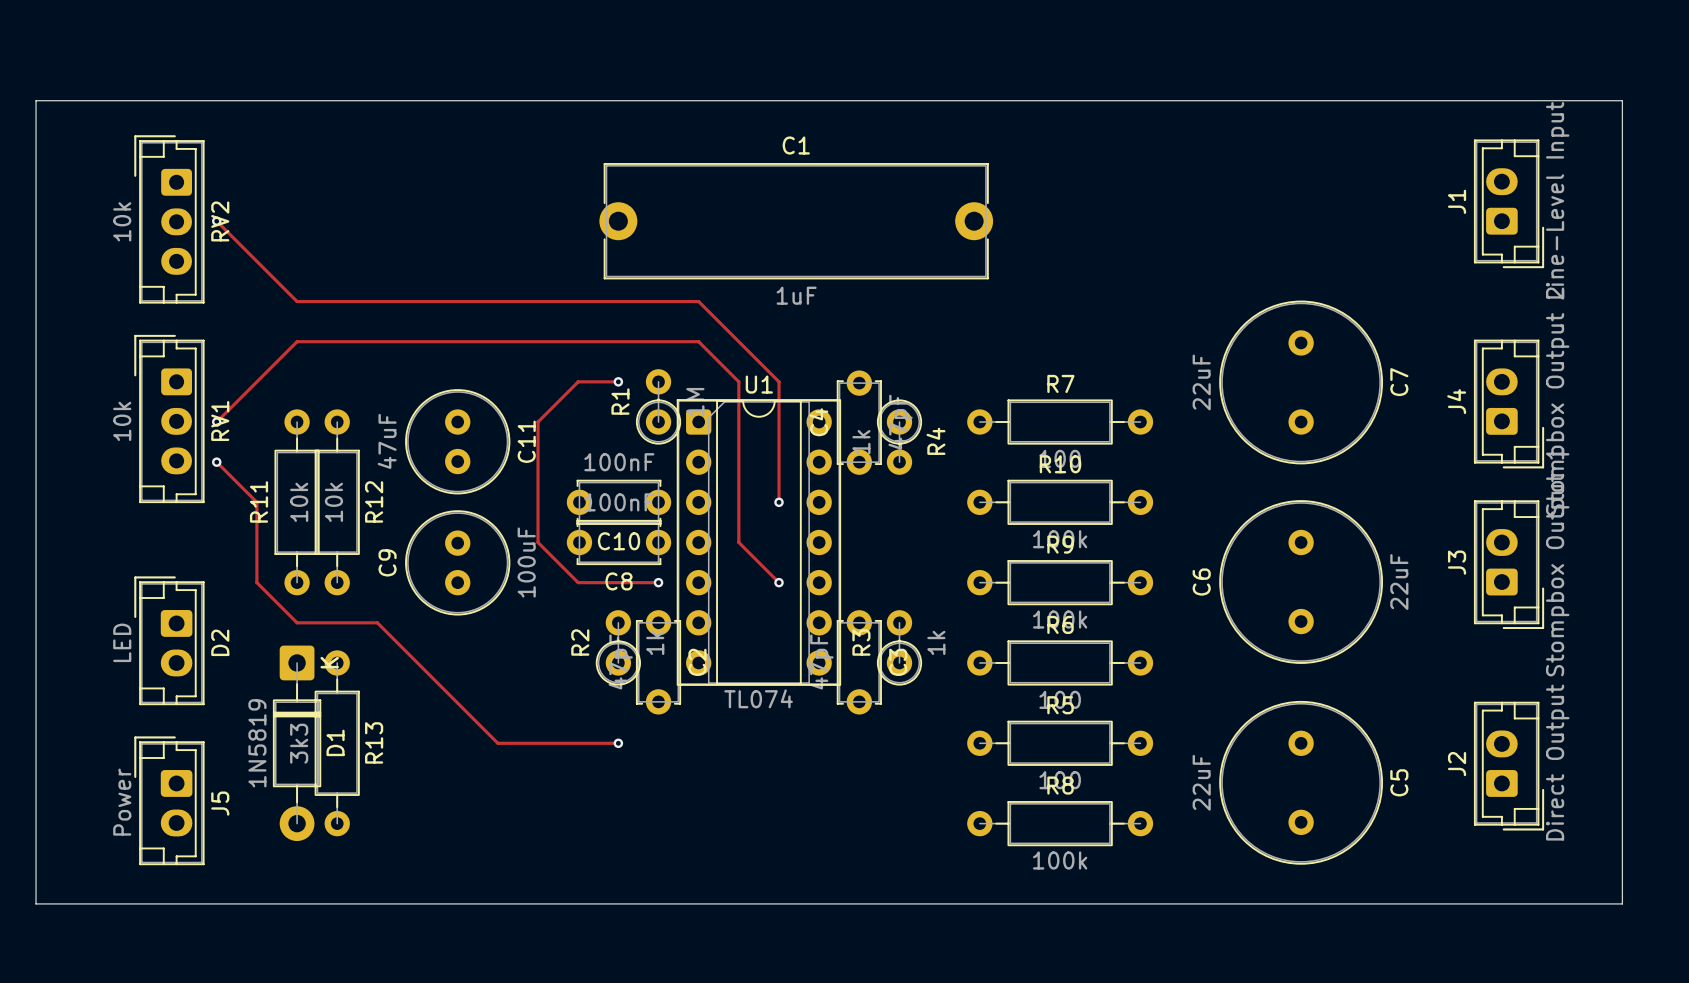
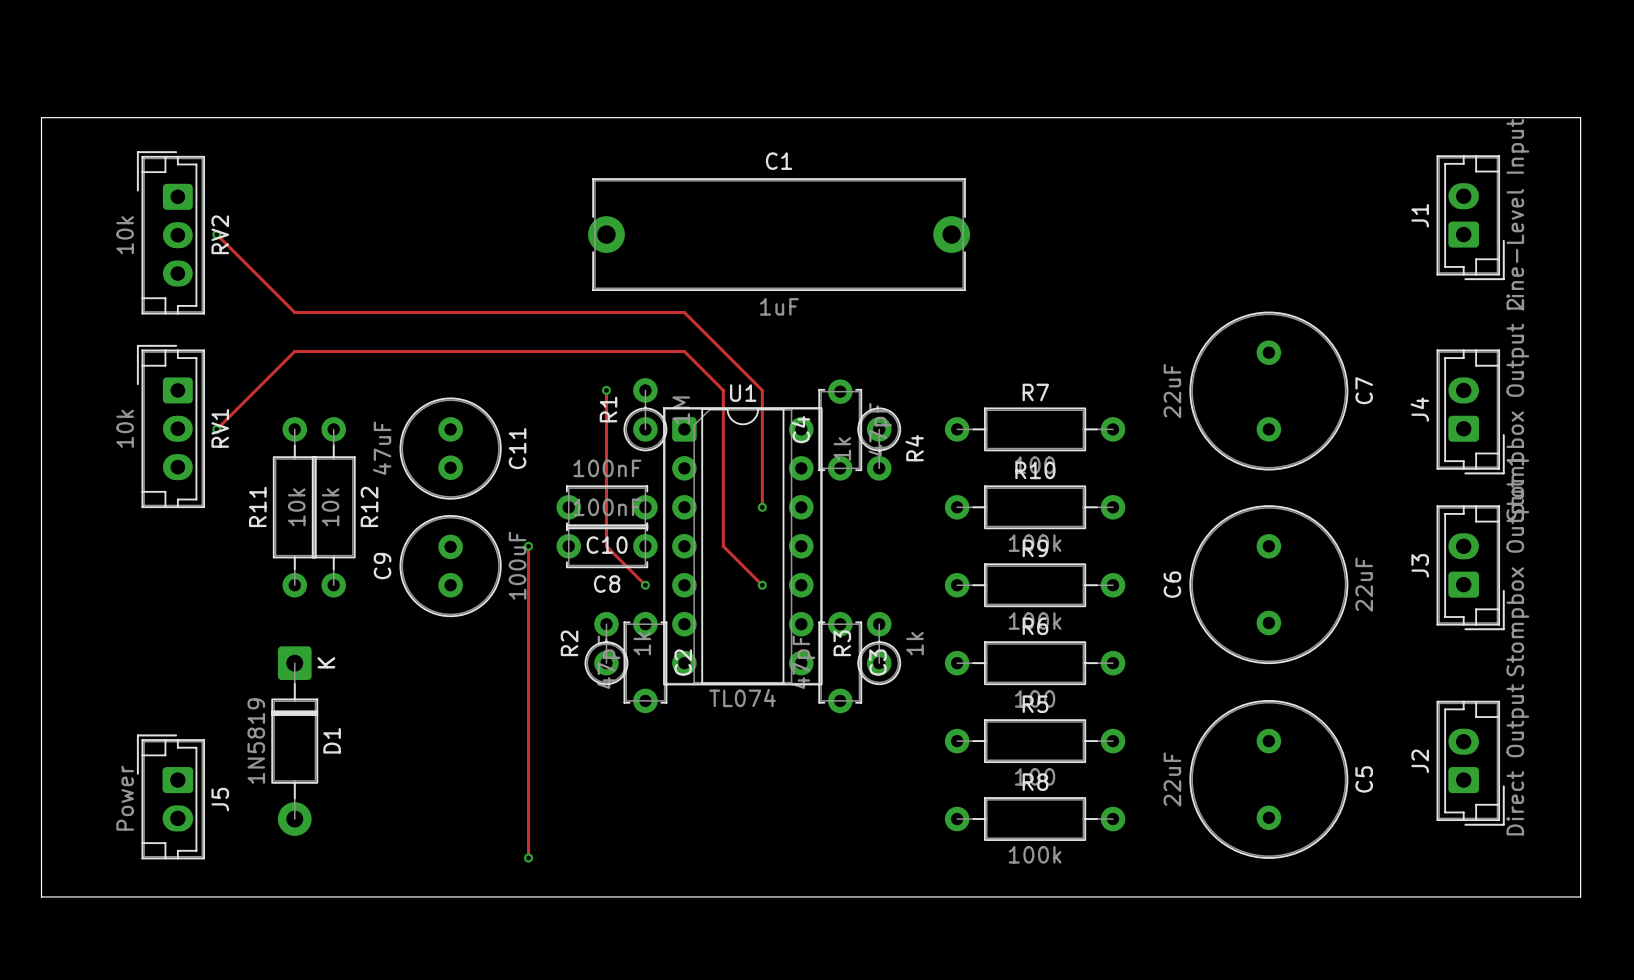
track: (618, 381) (578, 381) (538, 422) (538, 542) (578, 582) (658, 582) -> (606, 390) (606, 546) (645, 585)
track: (216, 462) (256, 502) (256, 582) (297, 622) (377, 622) (497, 743) (618, 743) -> none
via: (216, 462) -> none
track: none -> (528, 546) (528, 858)
via: none -> (528, 546)
D2: LED (169, 640) -> none
R13: 3k3 (337, 743) -> none
via: (618, 743) -> none
via: none -> (528, 858)

